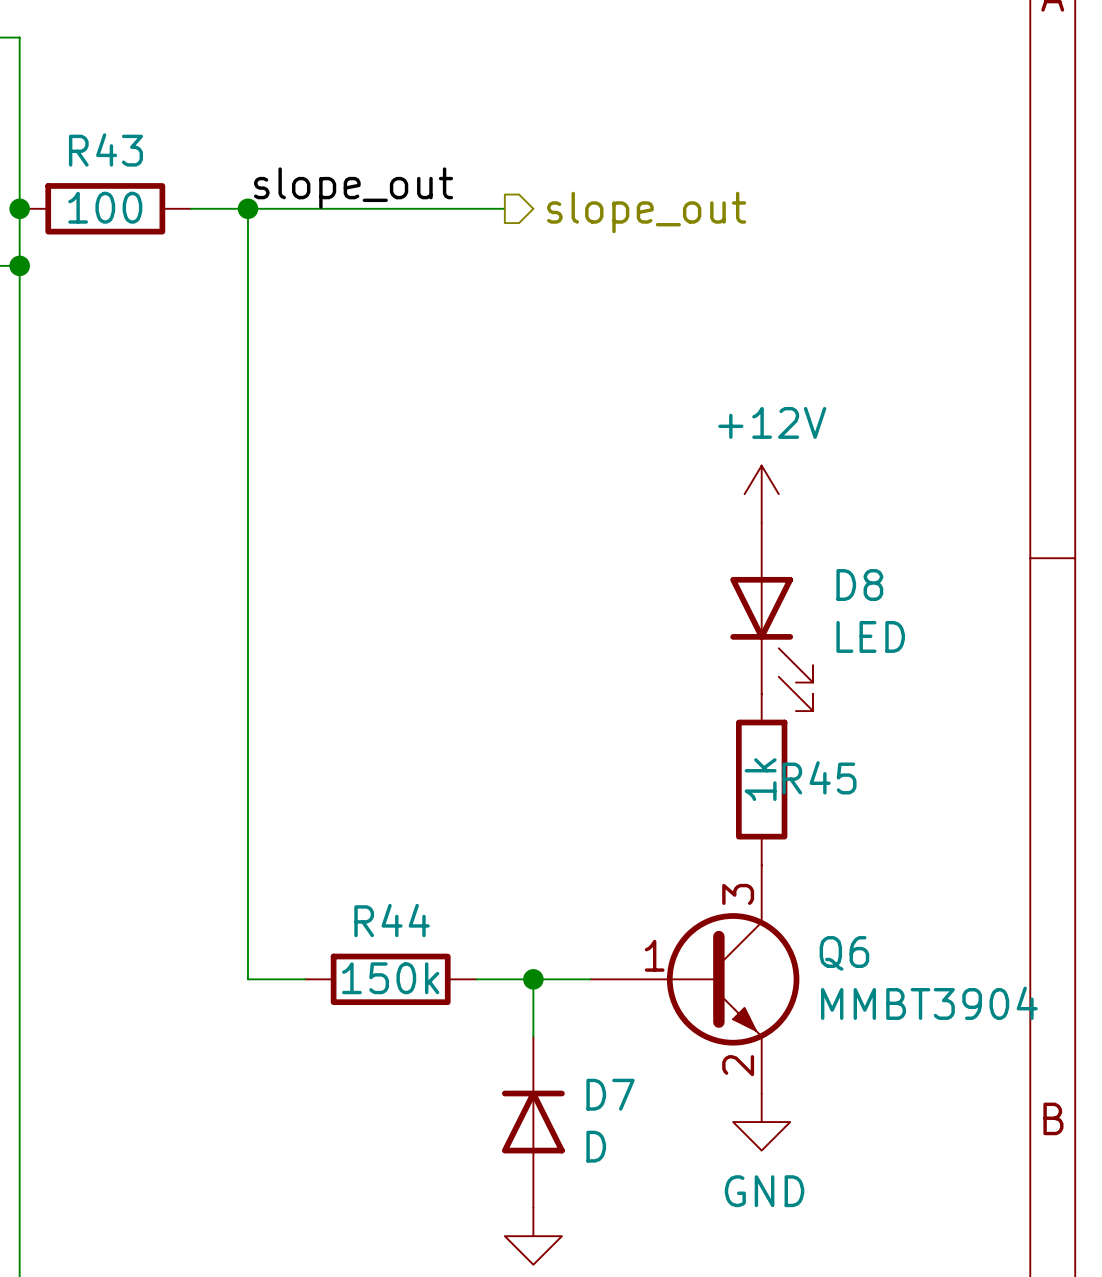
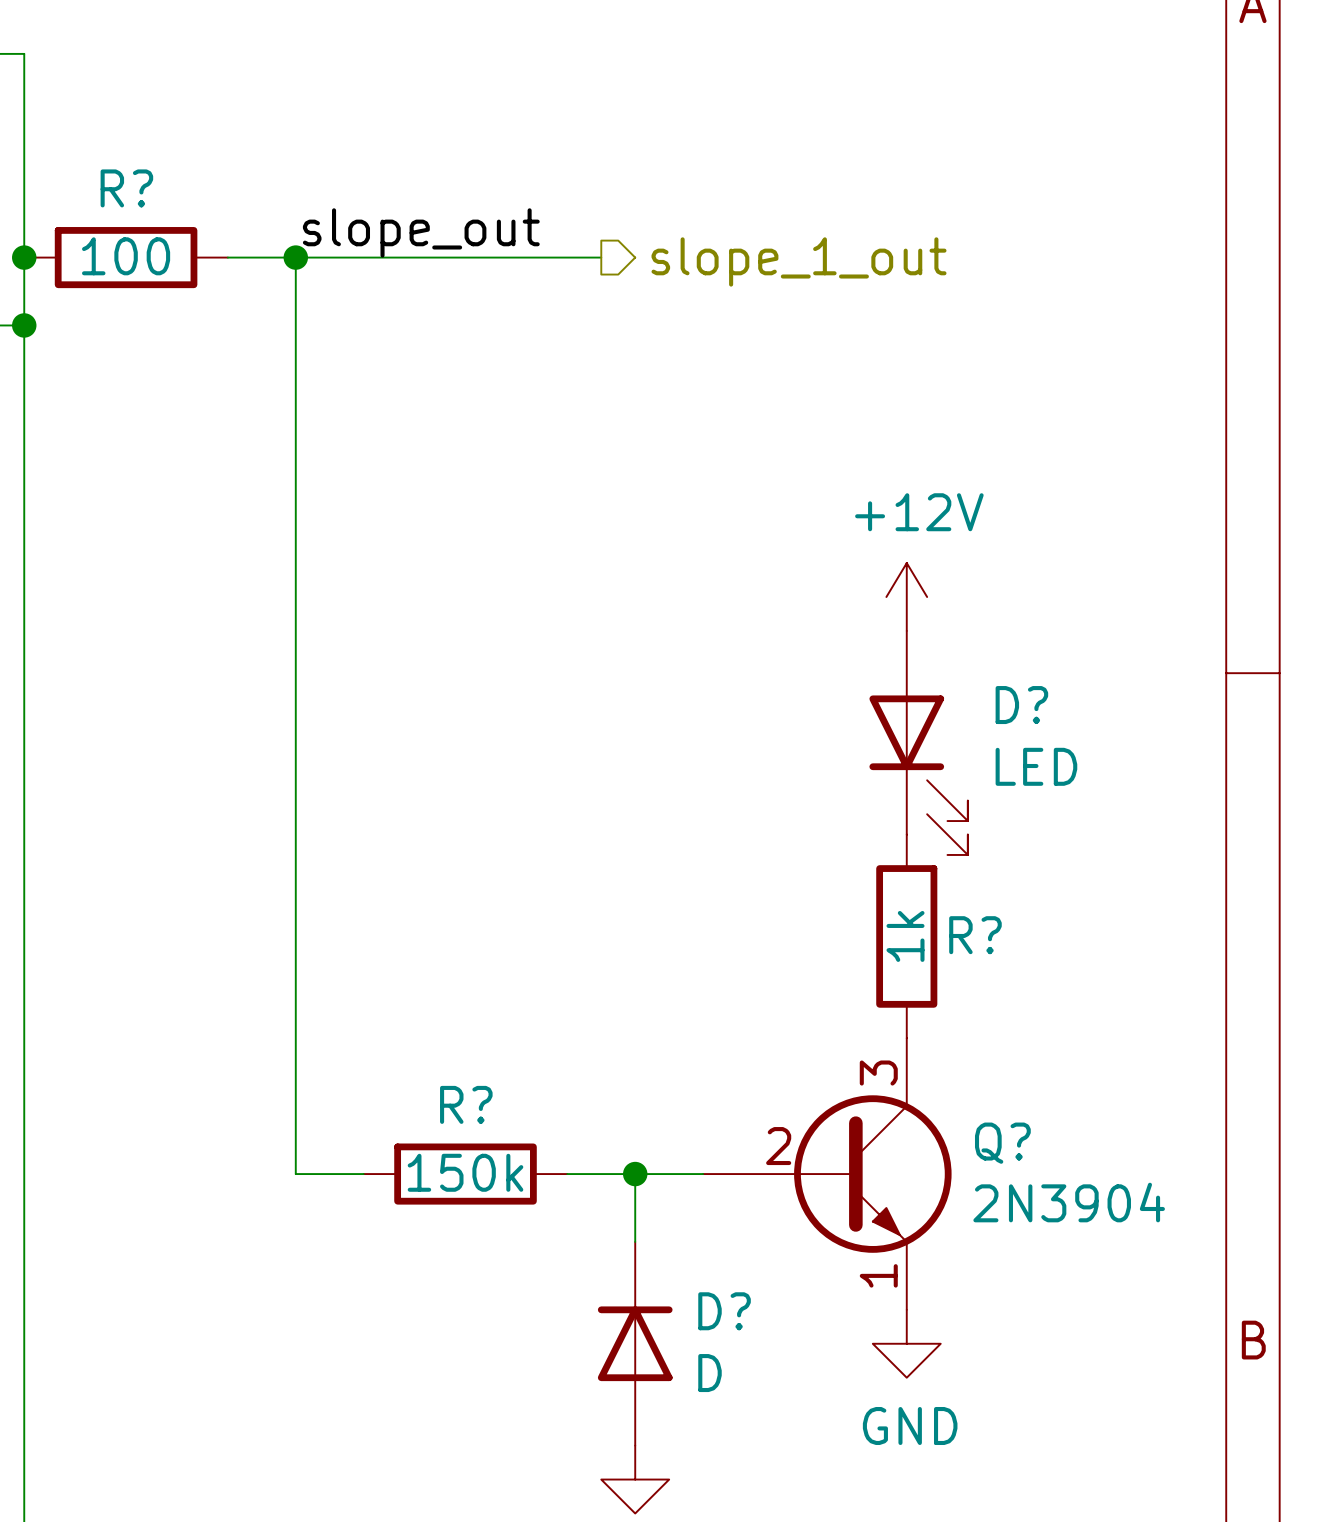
R43 name: R43 (105, 149) -> R? (126, 188)
hierarchical label: slope_out (646, 212) -> slope_1_out (799, 261)
D8 name: D8 (859, 585) -> D? (1021, 705)
R45 name: R45 (819, 777) -> R? (975, 935)
R44 name: R44 (392, 920) -> R? (466, 1104)
Q6 name: Q6 (844, 953) -> Q? (1002, 1143)
Q6 pin number: 1 (654, 955) -> 2 (778, 1146)
Q6 value: MMBT3904 (929, 1003) -> 2N3904 (1069, 1202)
Q6 pin number: 2 (738, 1065) -> 1 (878, 1275)
D7 name: D7 (610, 1094) -> D? (724, 1311)

